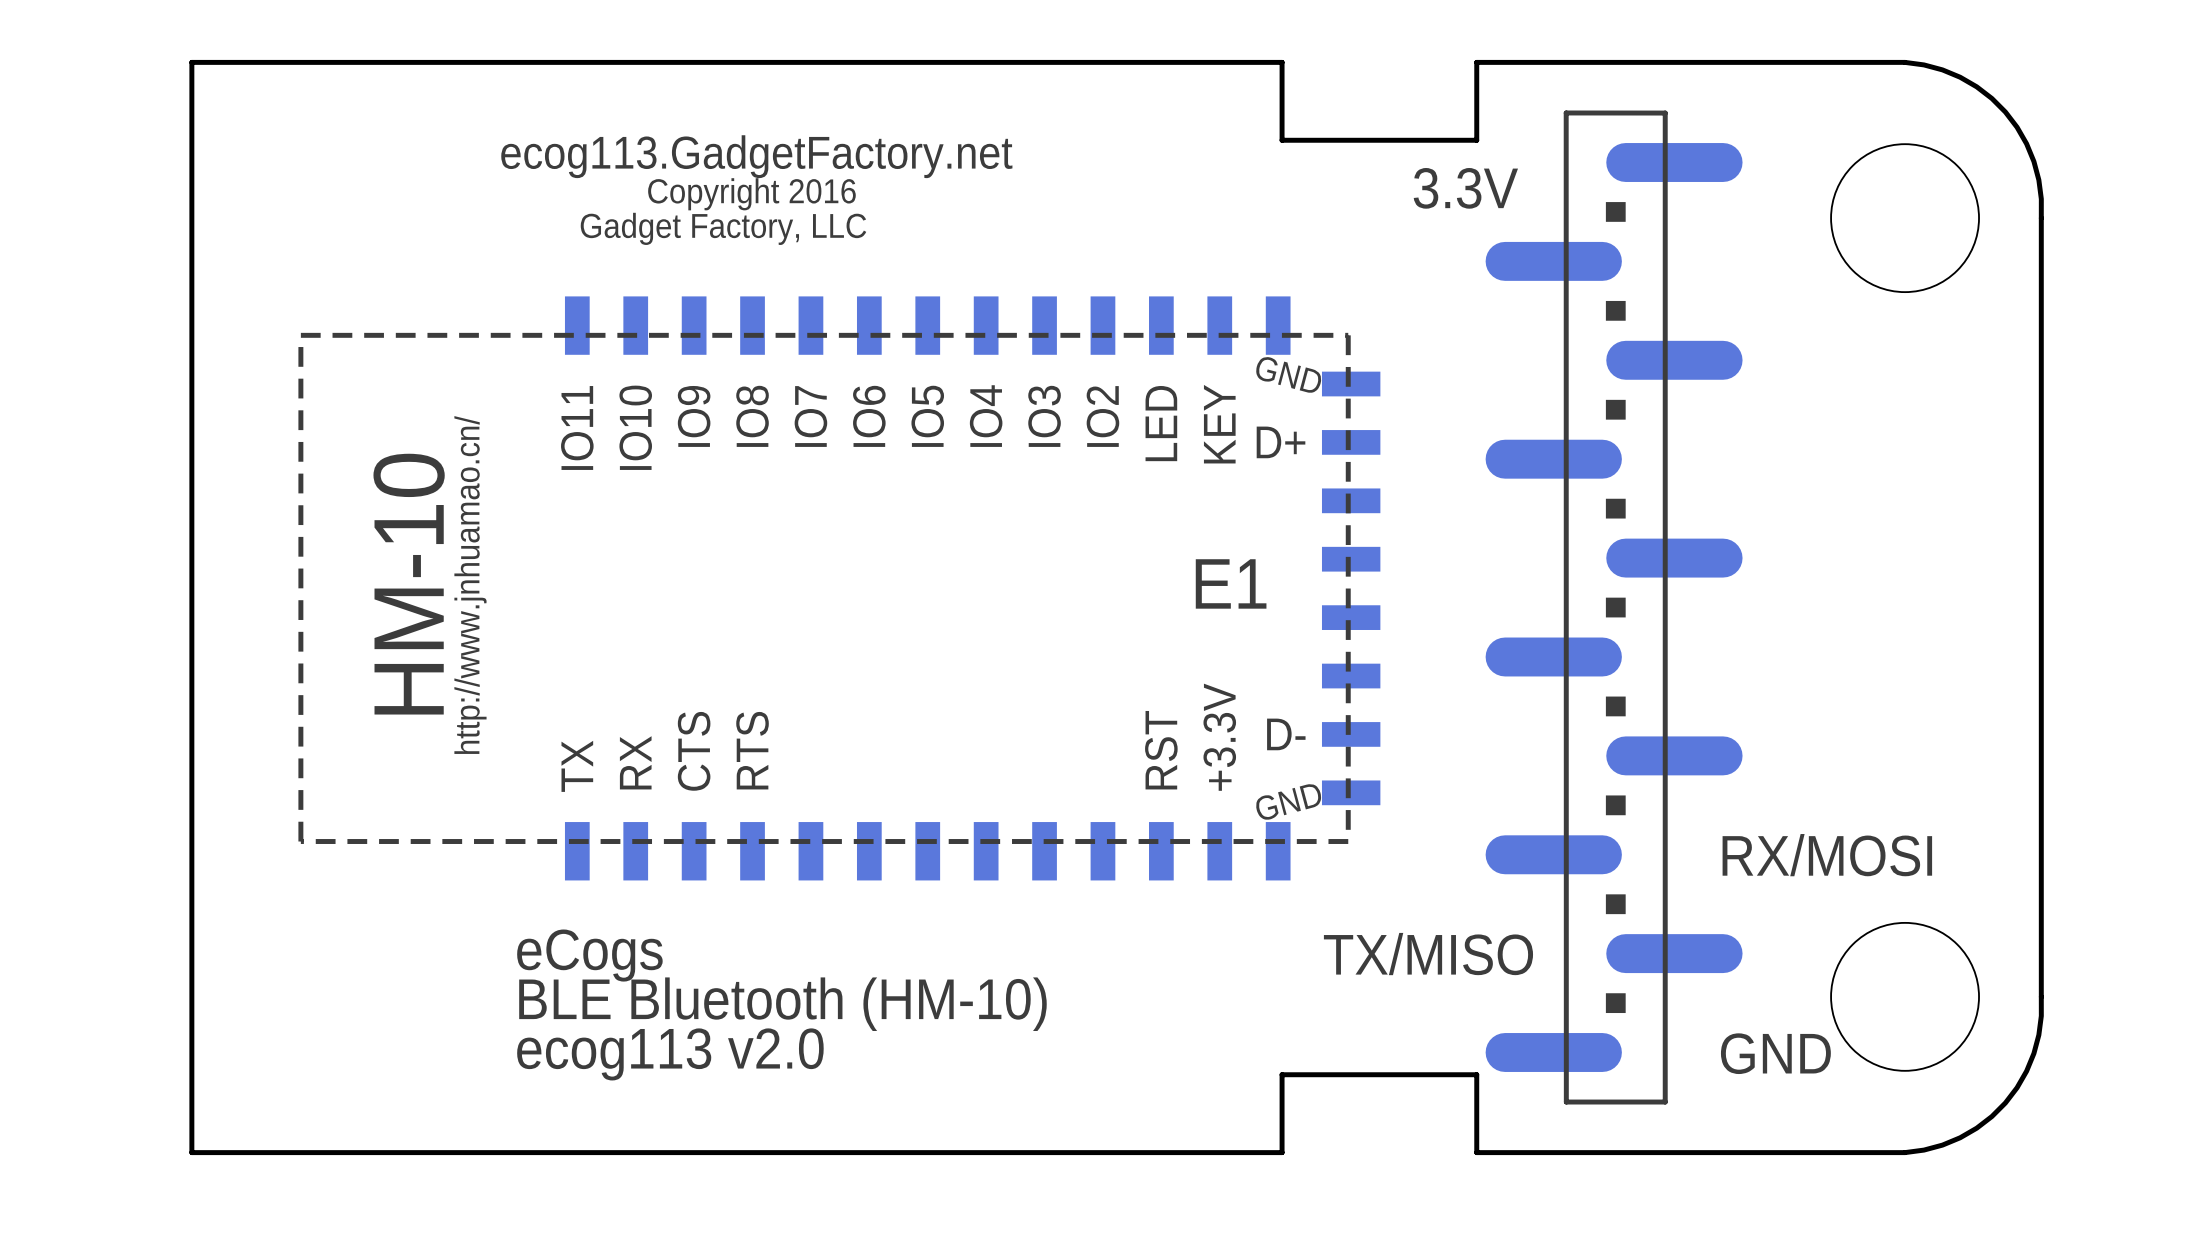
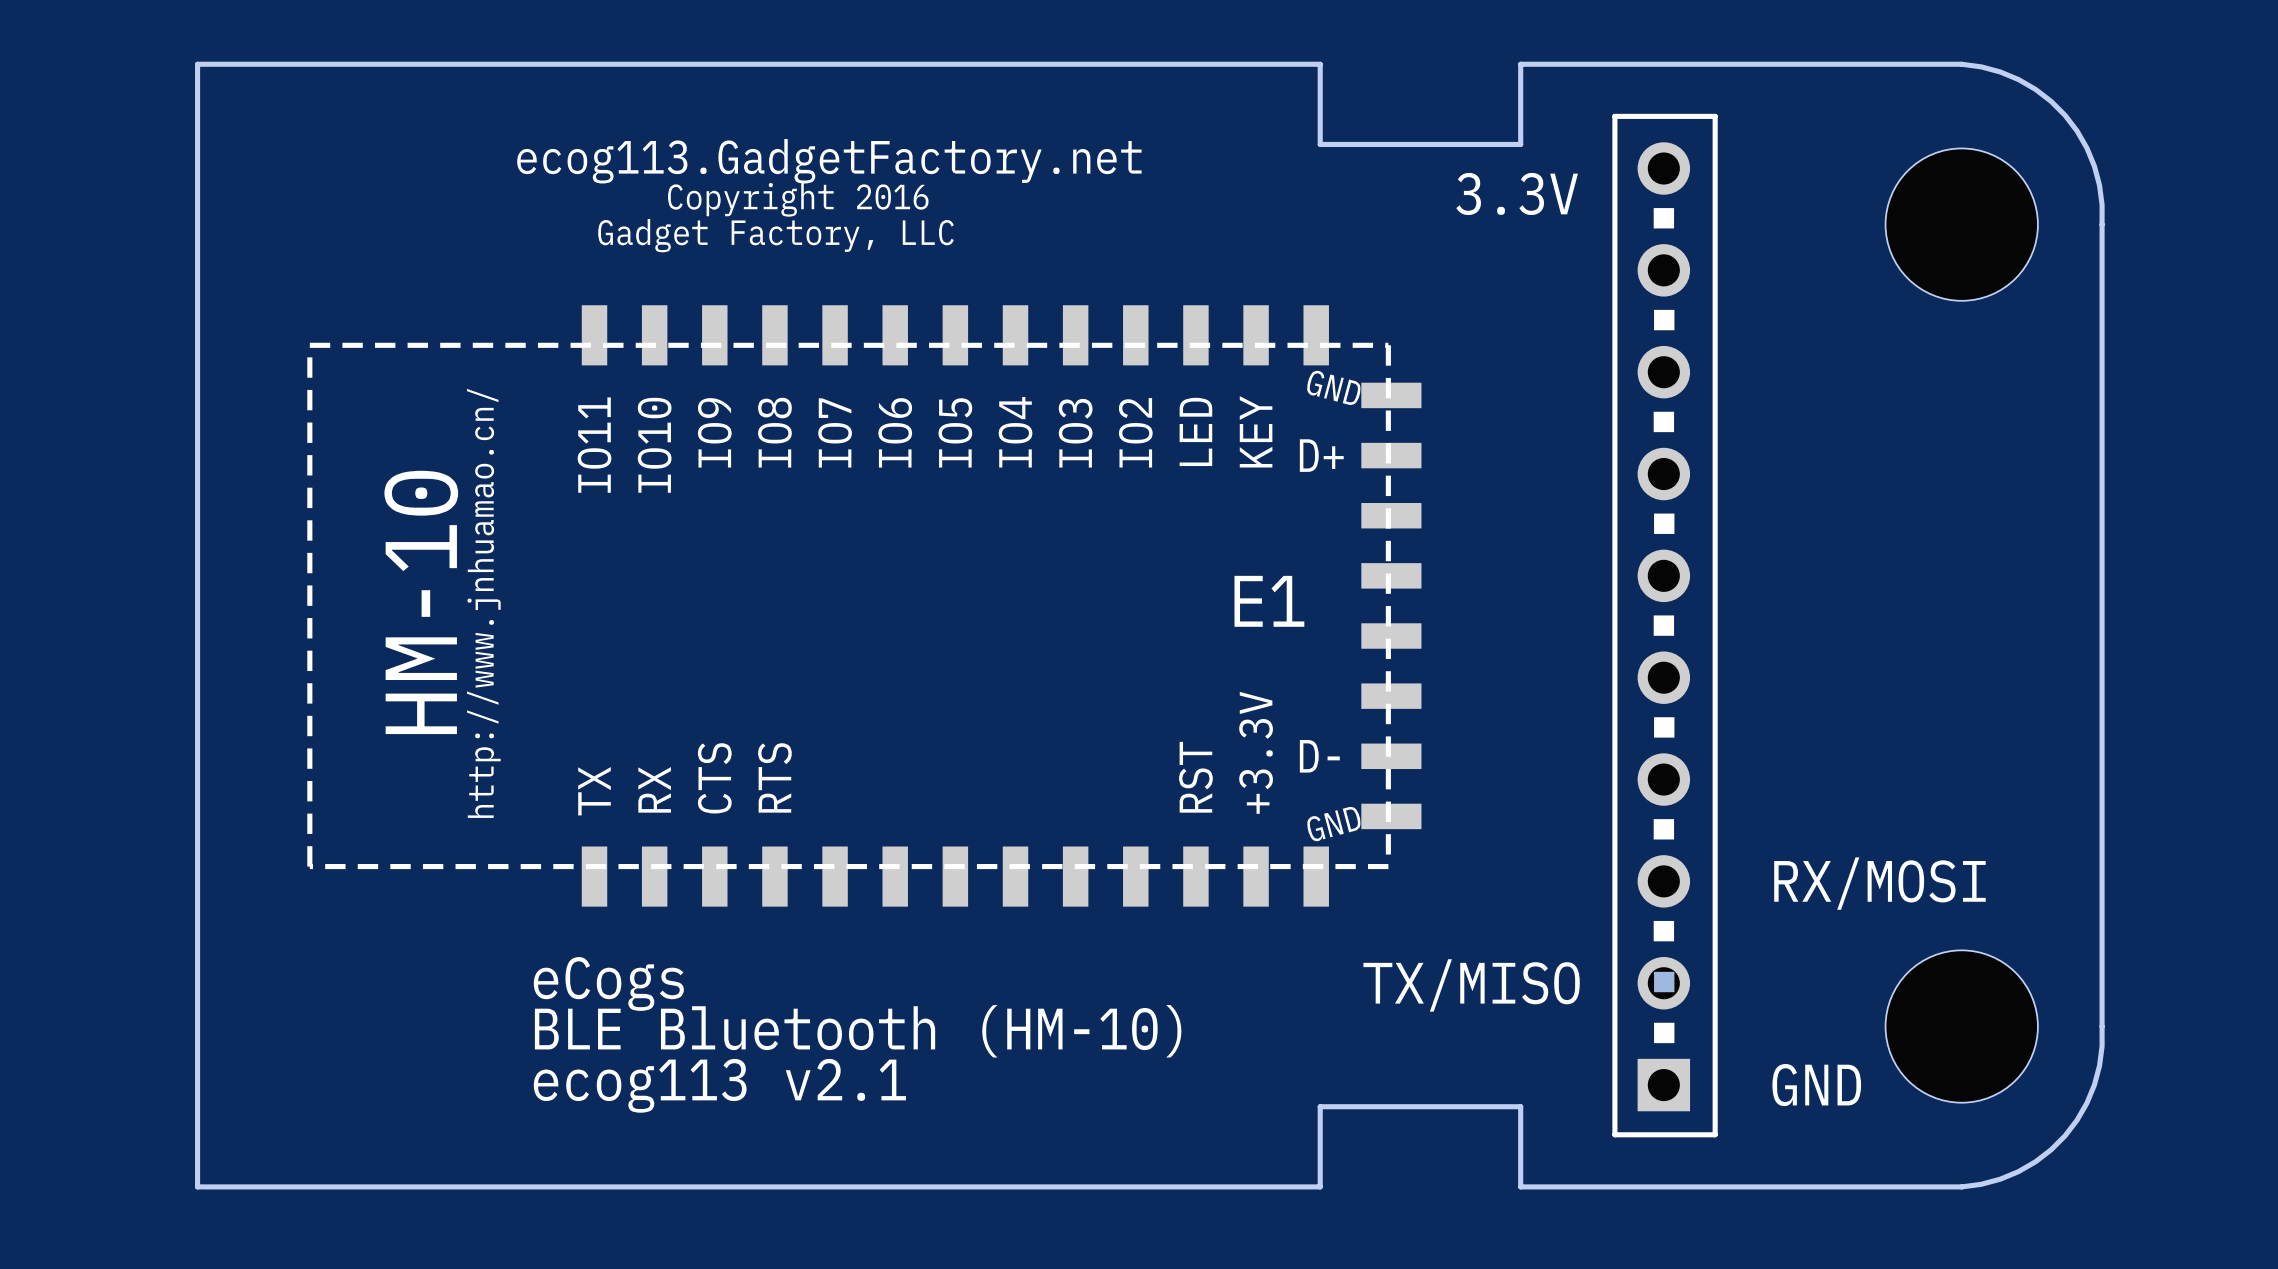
part footprint: [189, 59, 2044, 1156] -> [195, 61, 2105, 1190]
text: ecog113 v2.0 (670, 1054) -> ecog113 v2.1 (719, 1085)

